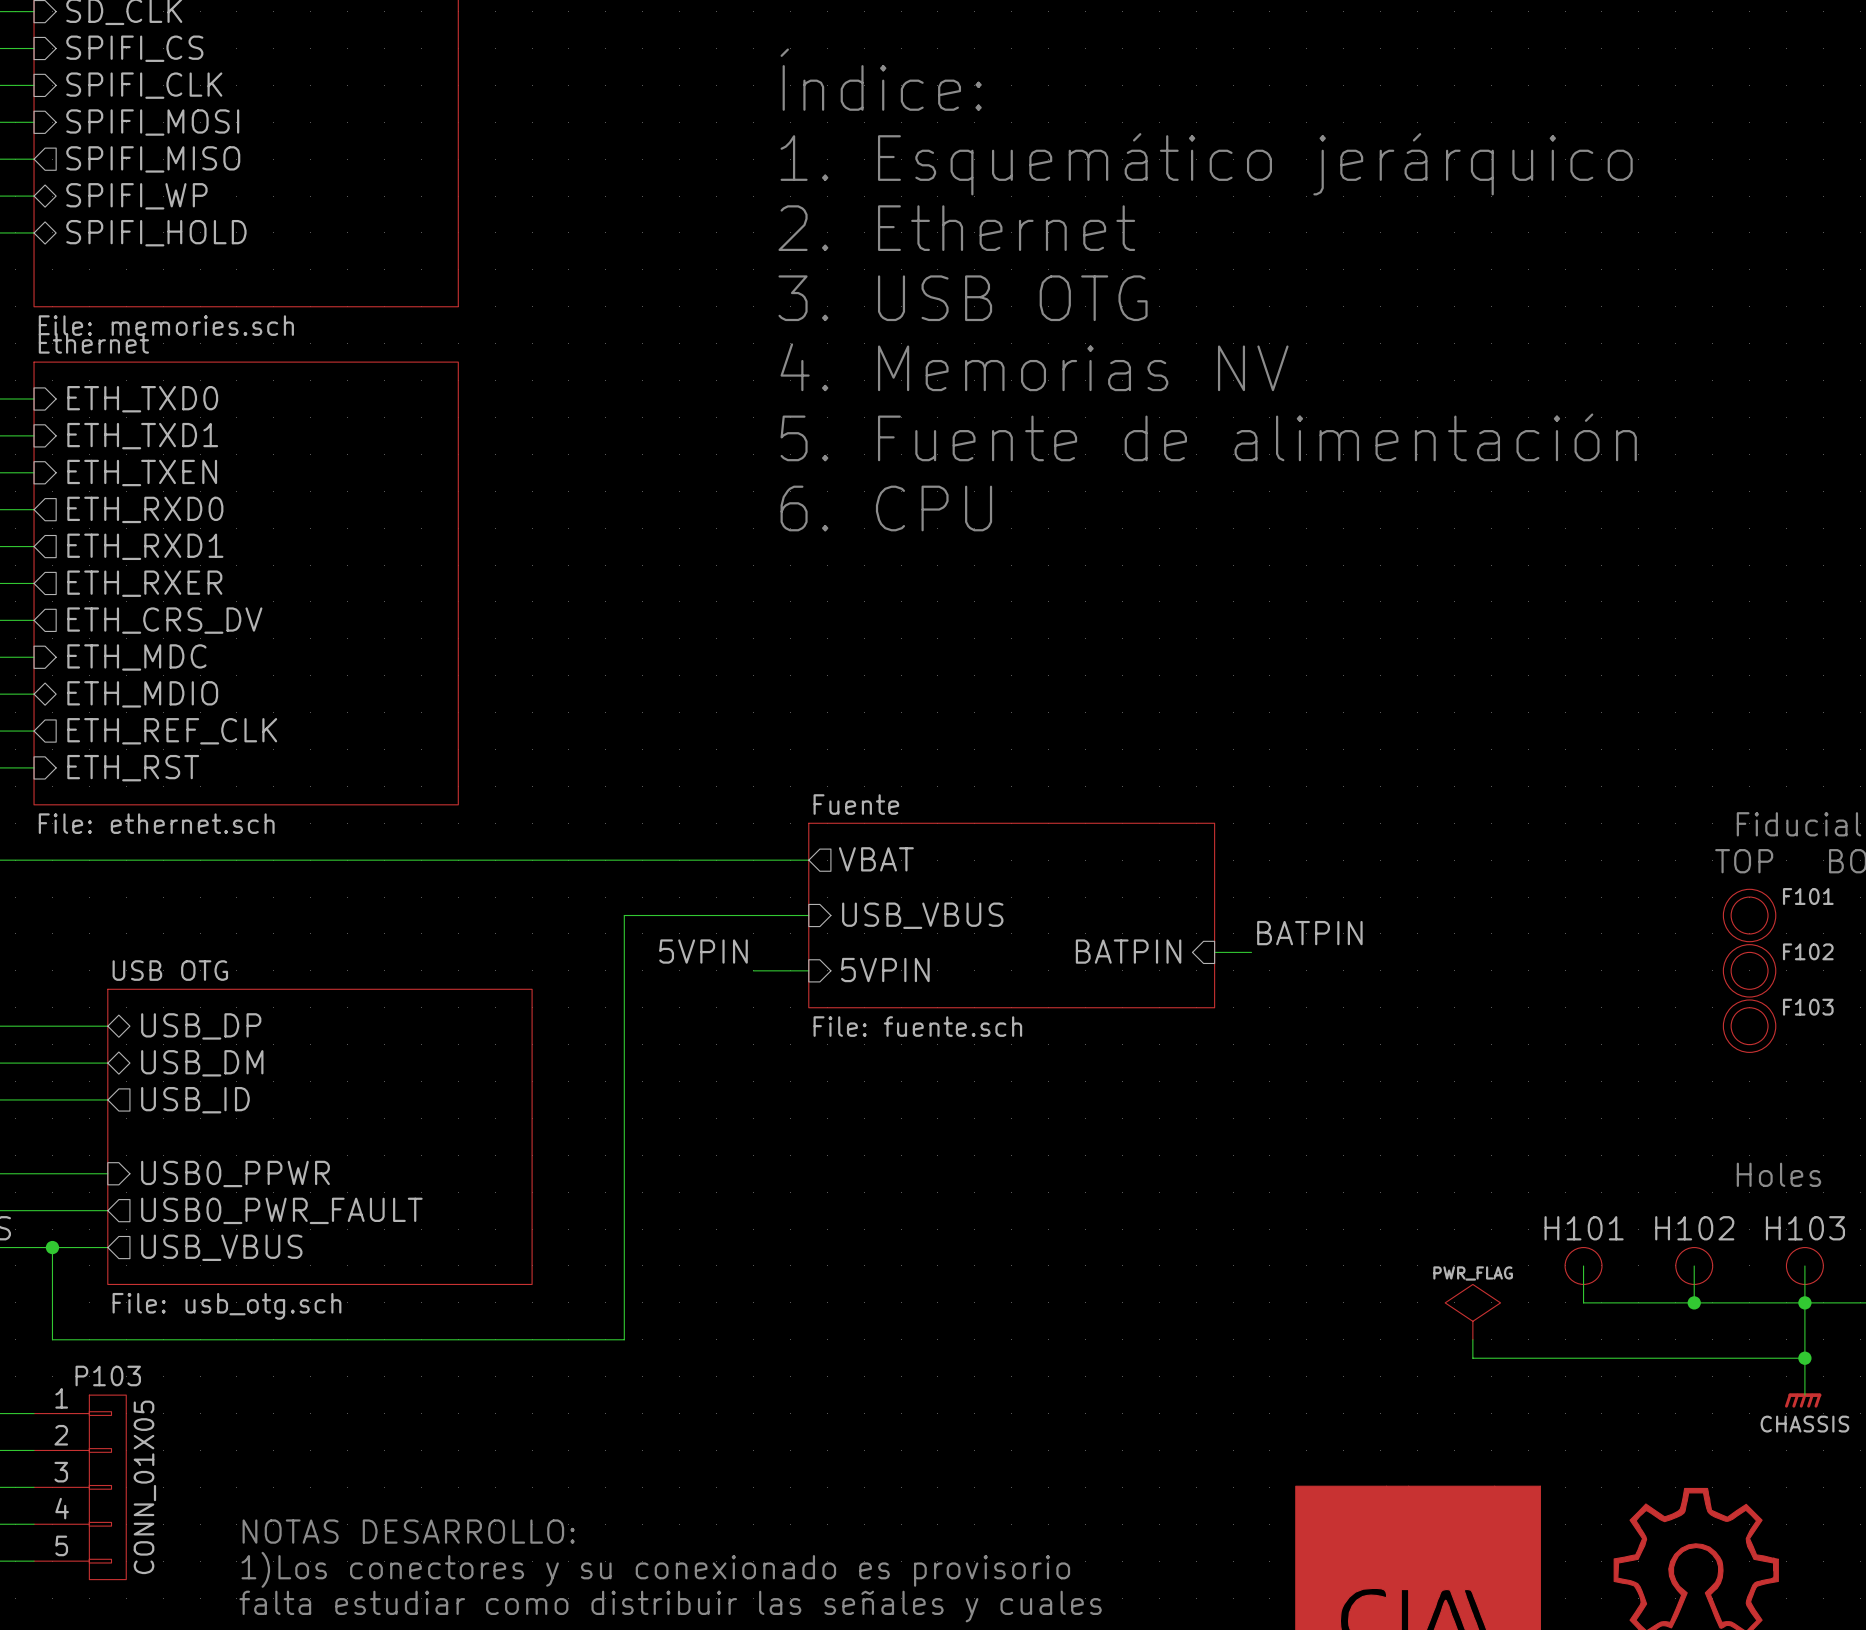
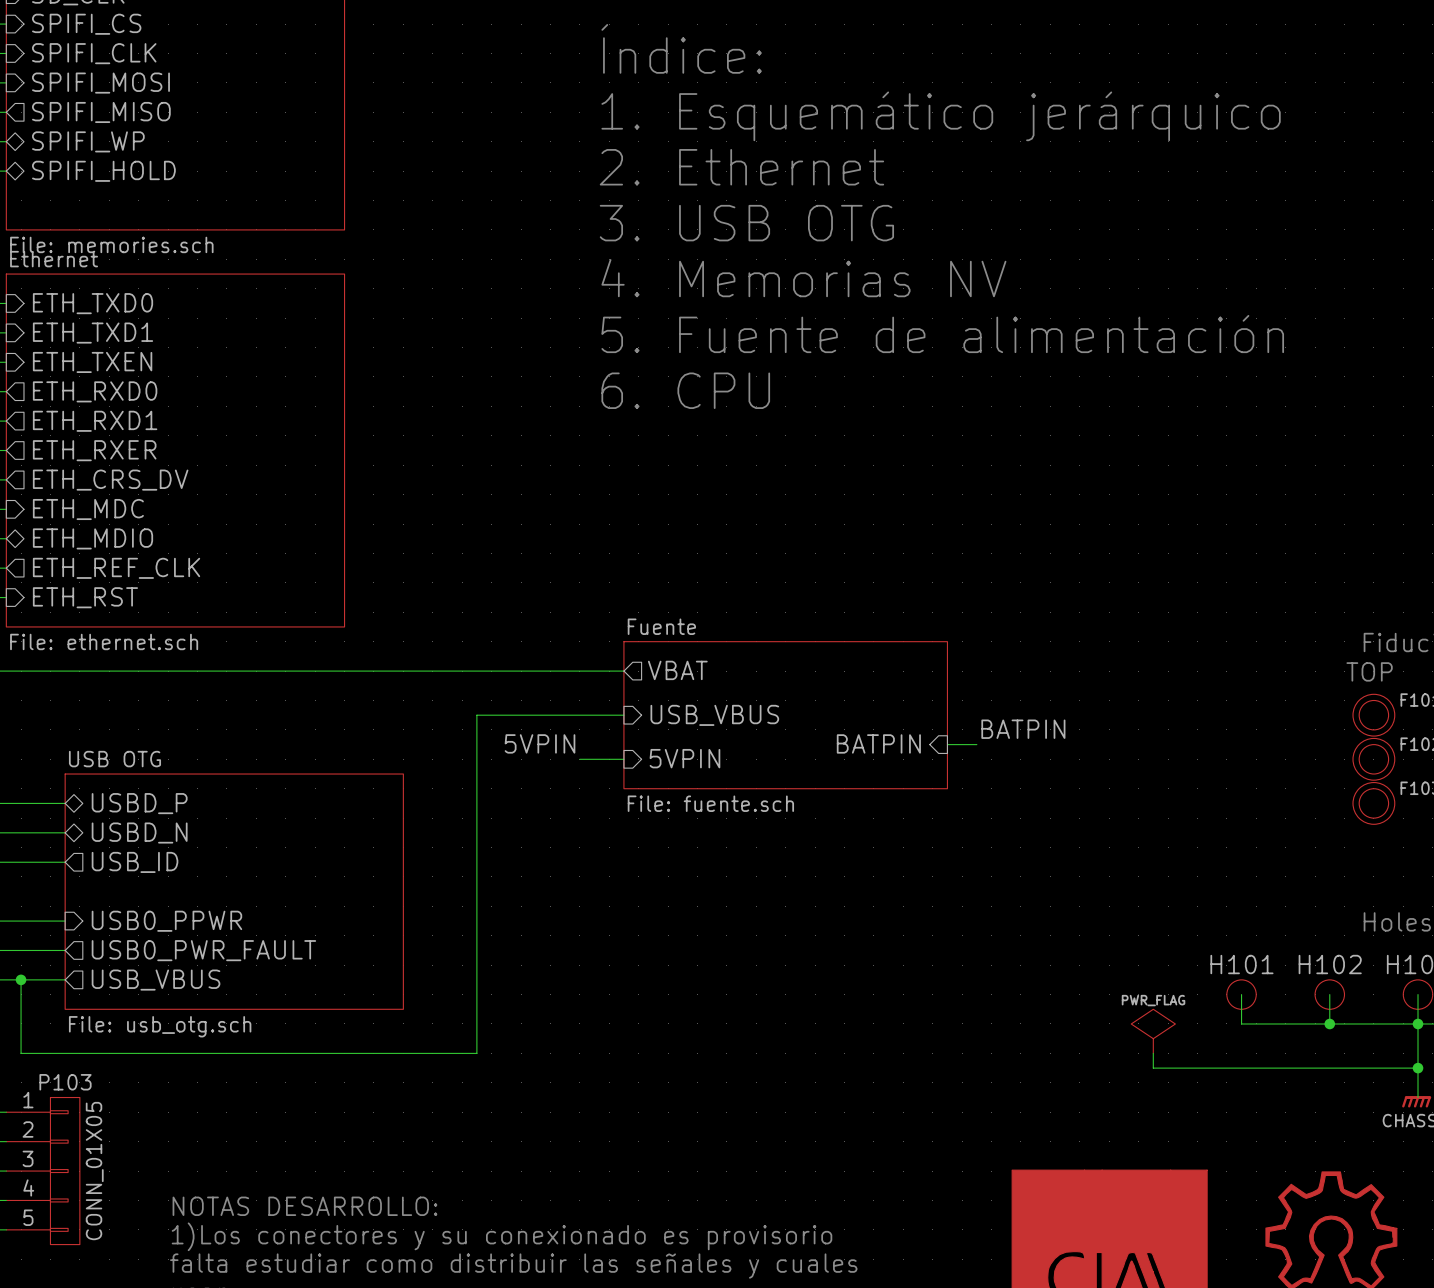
sheet pin: USB_DP (201, 1026) -> USBD_P (139, 803)
sheet pin: USB_DM (202, 1063) -> USBD_N (139, 833)

